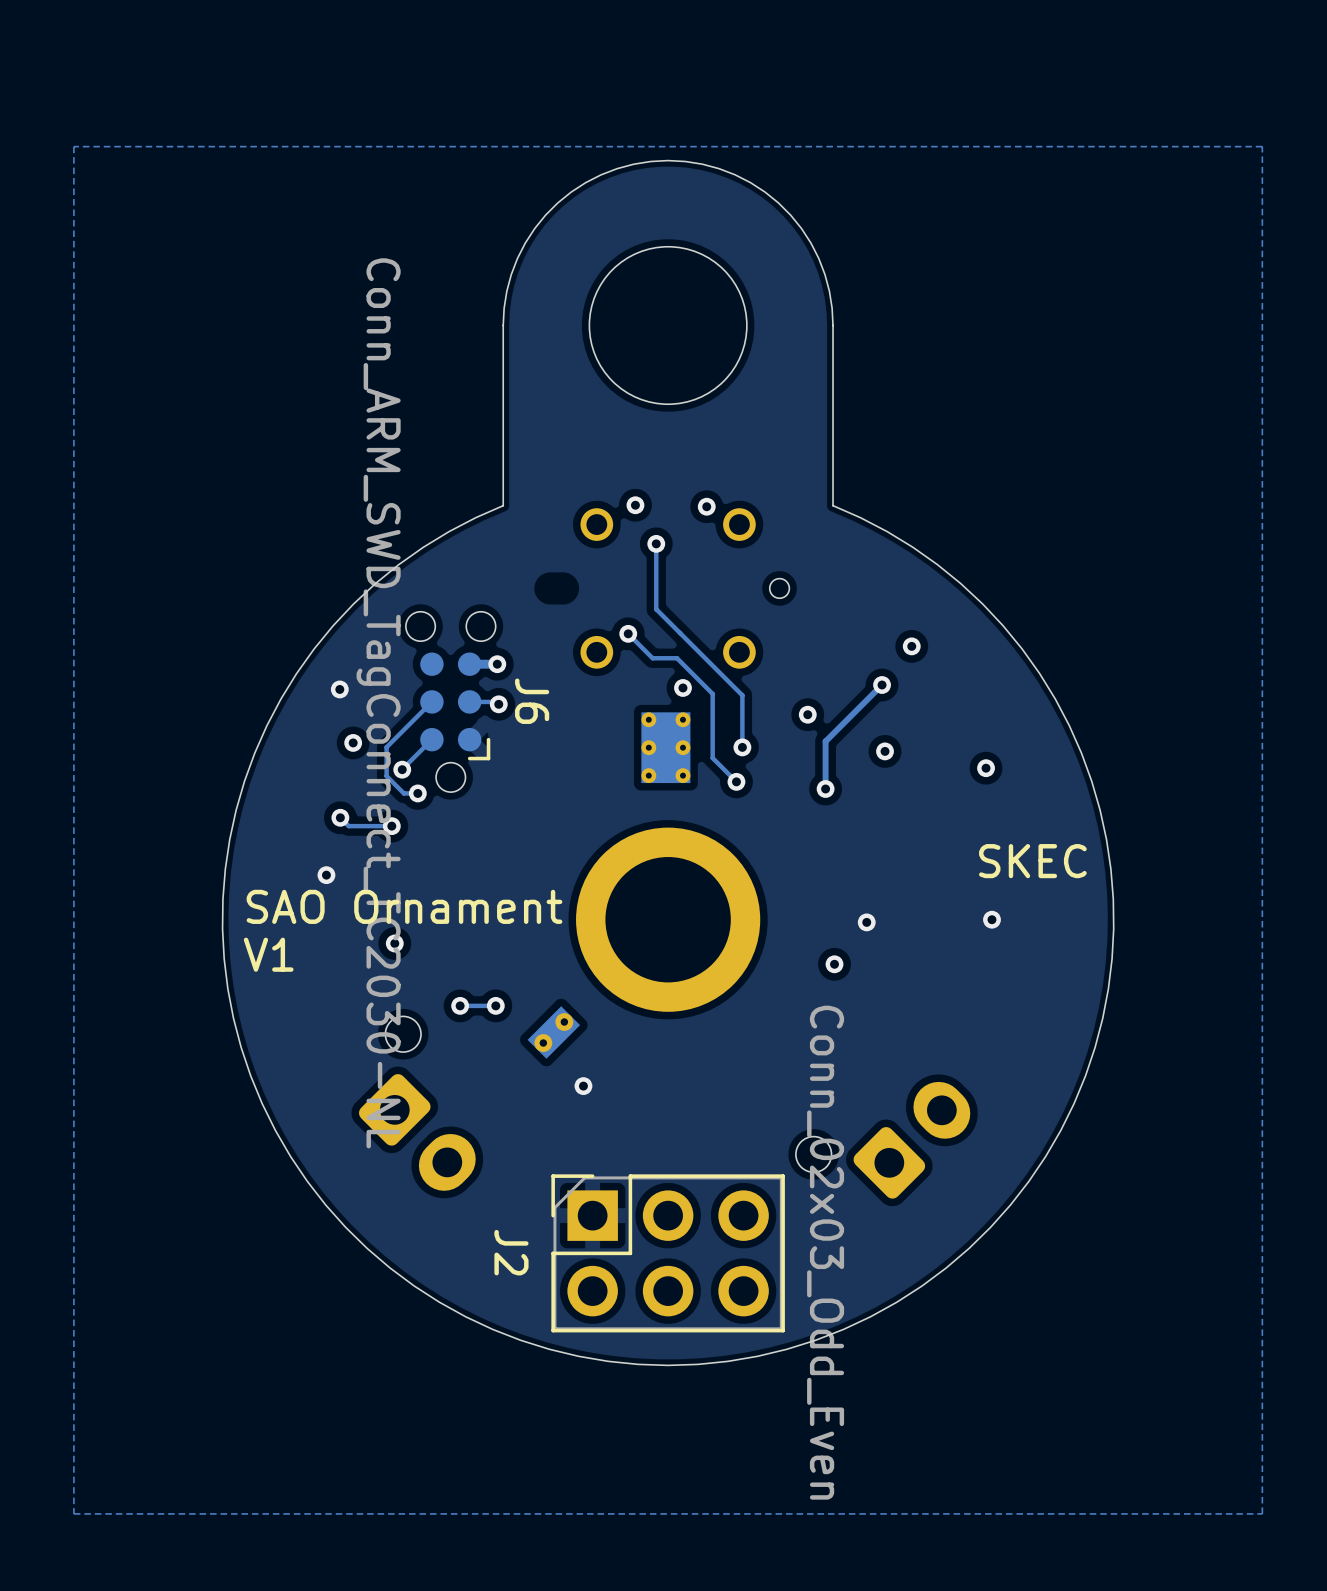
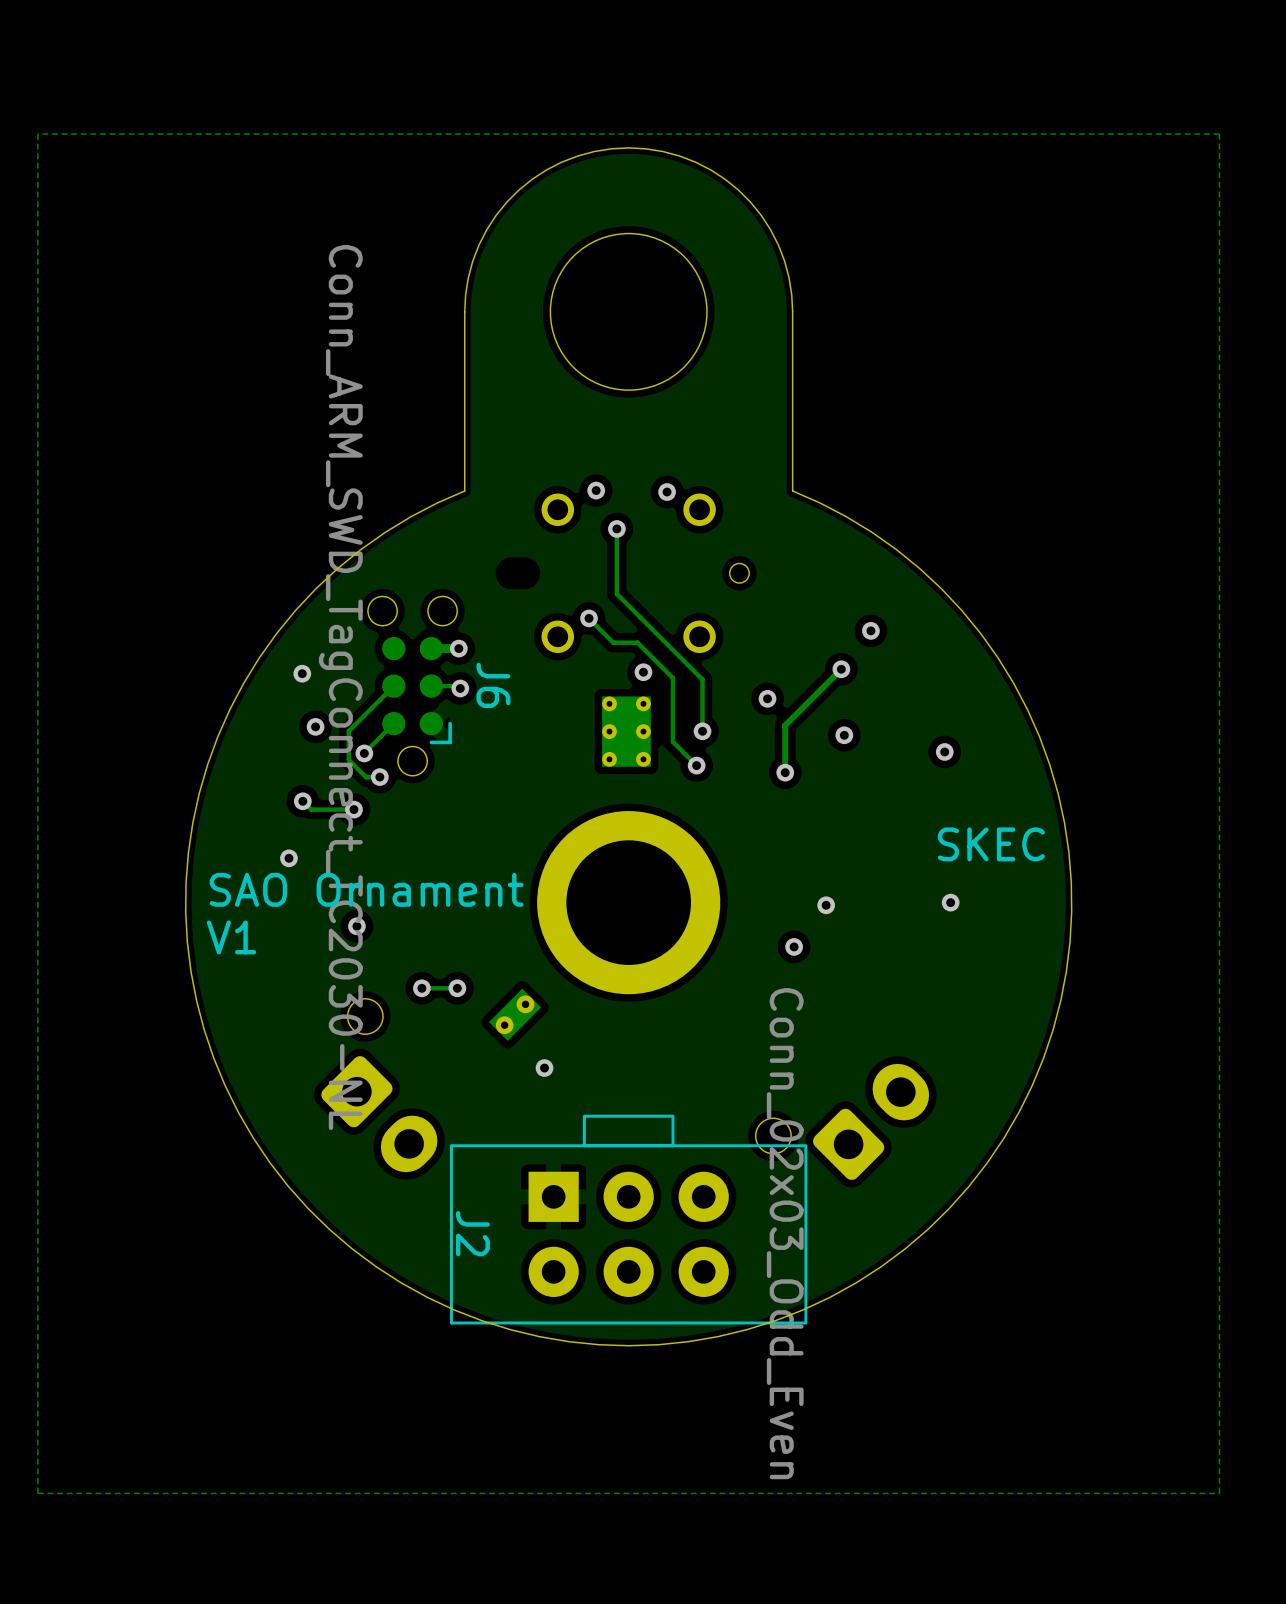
J2 footprint: [551, 1174, 785, 1333] -> [449, 1114, 808, 1325]

